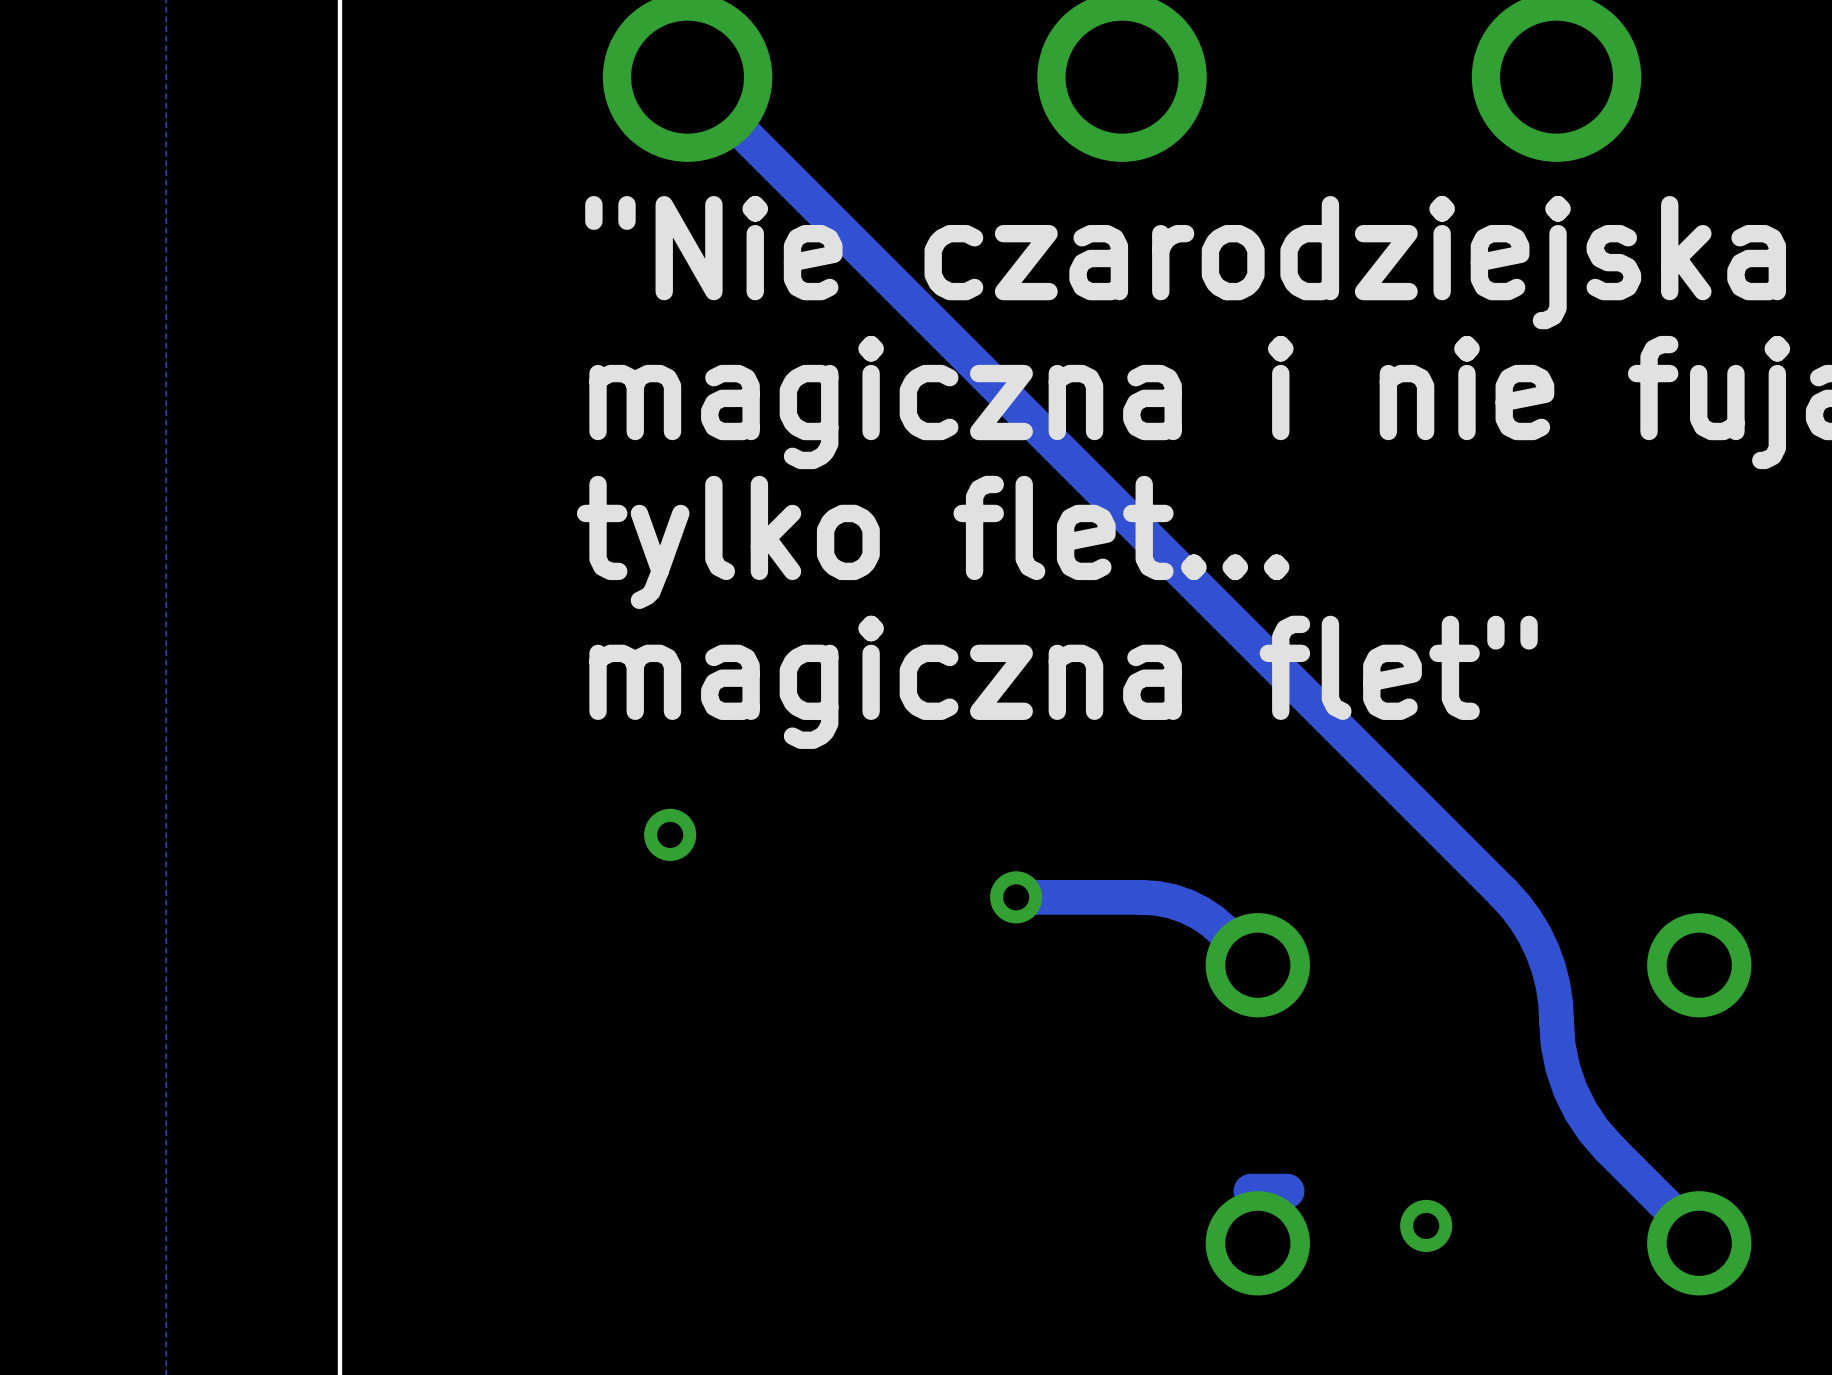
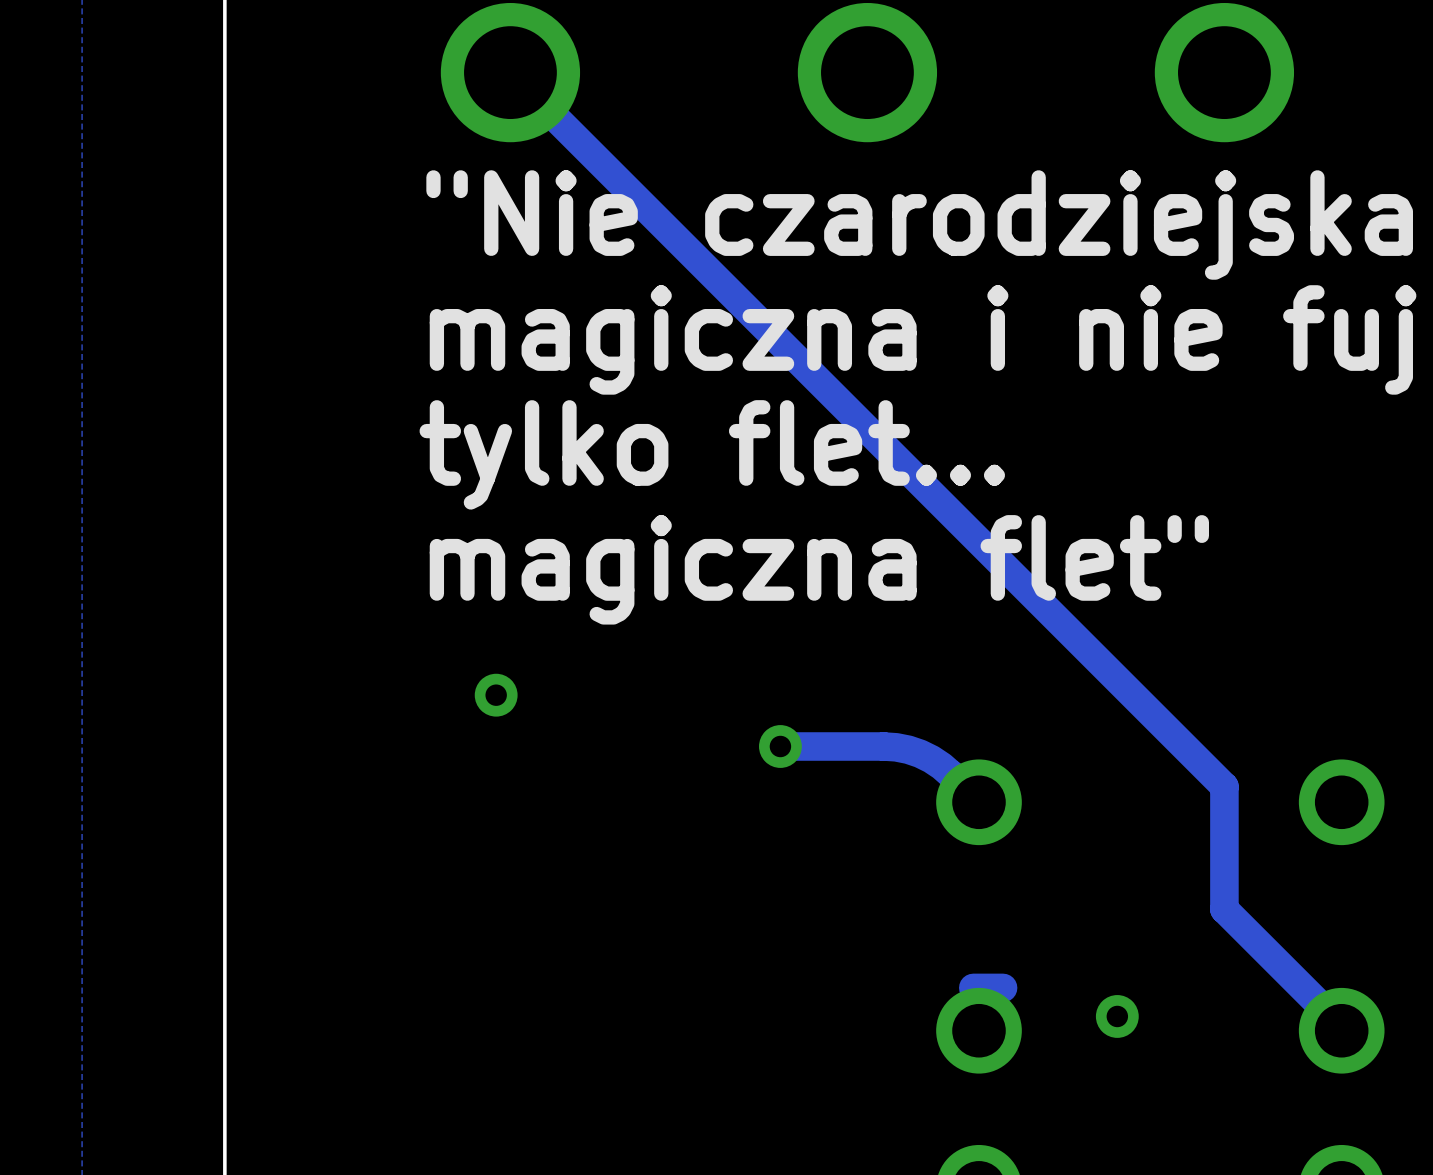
track: (1503, 893) (1526, 920) (1542, 951) (1553, 985) (1558, 1044) (1562, 1067) (1570, 1089) (1580, 1111) (1593, 1130) (1609, 1148) -> (1181, 743) (1224, 786) (1224, 909) (1267, 952)

